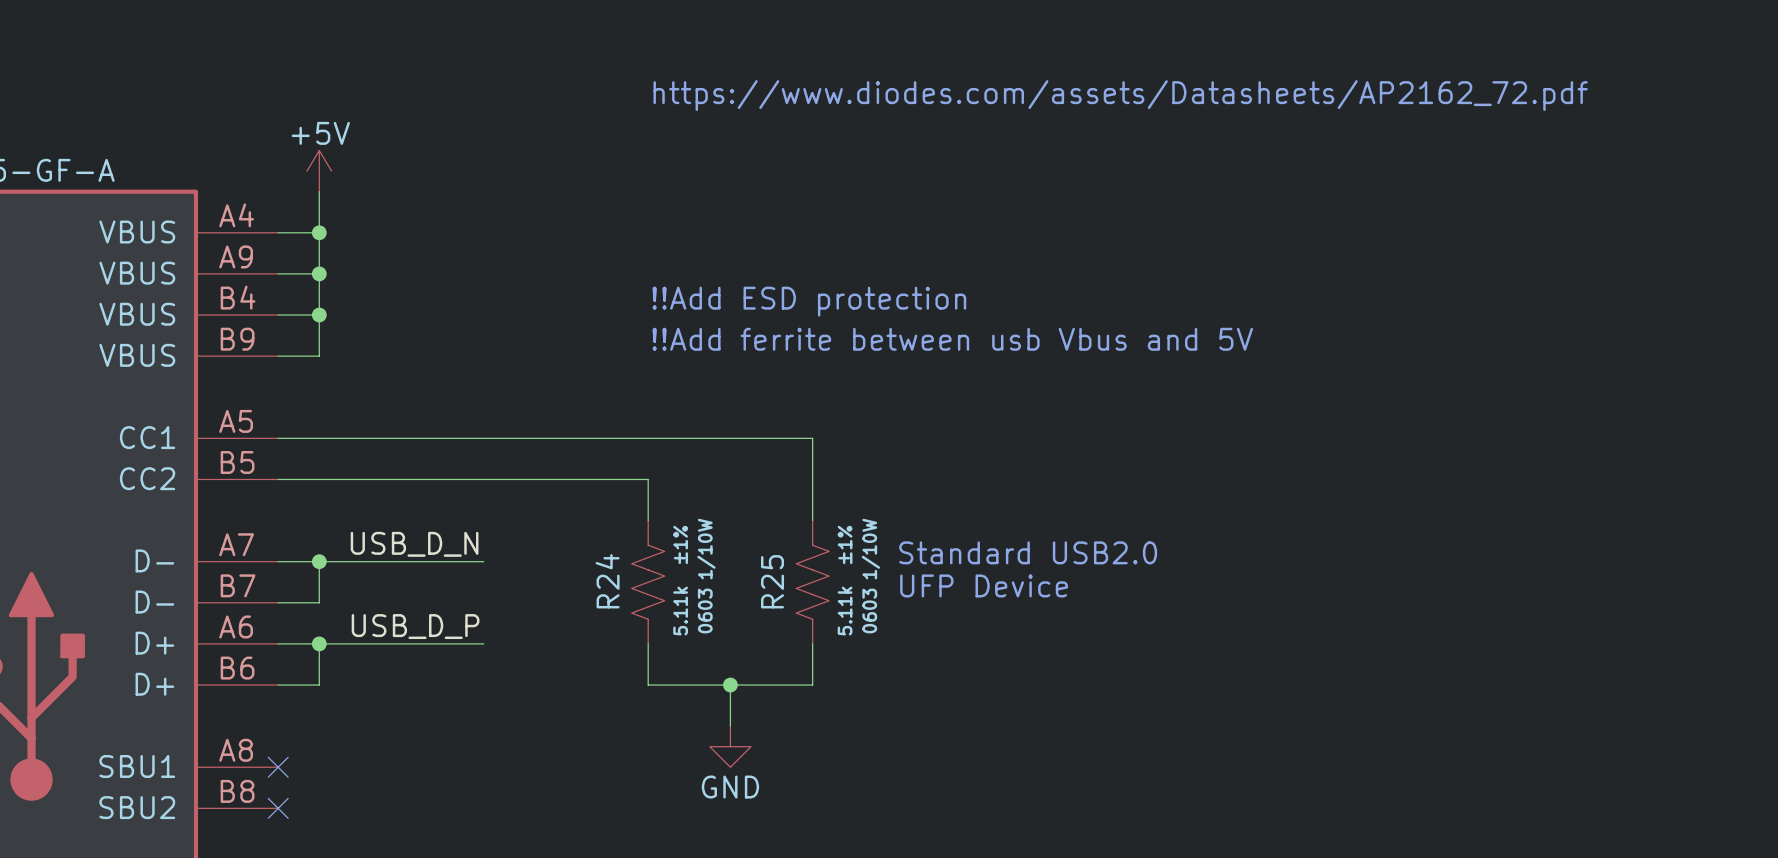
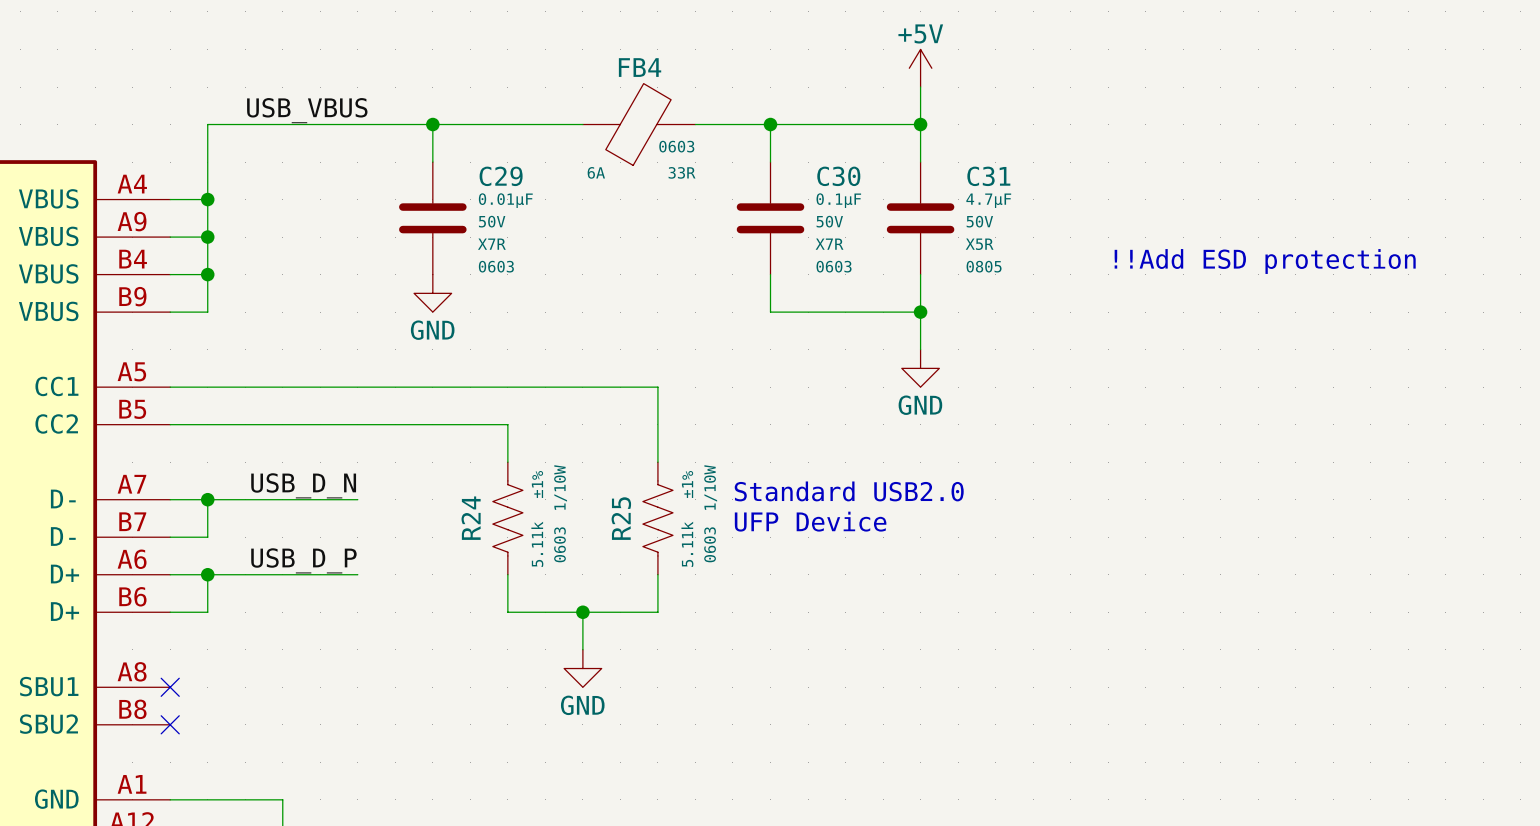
power symbol: none -> +5V (920, 68)
text: https://www.diodes.com/assets/Datasheets/AP2162_72.pdf (1120, 95) -> none
wire: none -> (920, 87) (920, 162)
label: none -> USB_VBUS (307, 110)
wire: none -> (432, 124) (432, 162)
junction: none -> (432, 124)
wire: none -> (582, 124) (207, 124) (207, 162)
FB4: none -> (639, 124)
wire: none -> (695, 124) (920, 124)
wire: none -> (770, 124) (770, 162)
junction: none -> (770, 124)
junction: none -> (920, 124)
power symbol: +5V (319, 171) -> none
C29: none -> (432, 218)
C30: none -> (770, 218)
C31: none -> (920, 218)
text: !!Add ESD protection (809, 301) -> none
text: none -> !!Add ESD protection (1265, 261)
wire: none -> (770, 274) (770, 312) (920, 312)
wire: none -> (920, 274) (920, 349)
power symbol: none -> GND (432, 293)
text: !!Add ferrite between usb Vbus and 5V (952, 339) -> none
junction: none -> (920, 312)
power symbol: none -> GND (920, 368)

